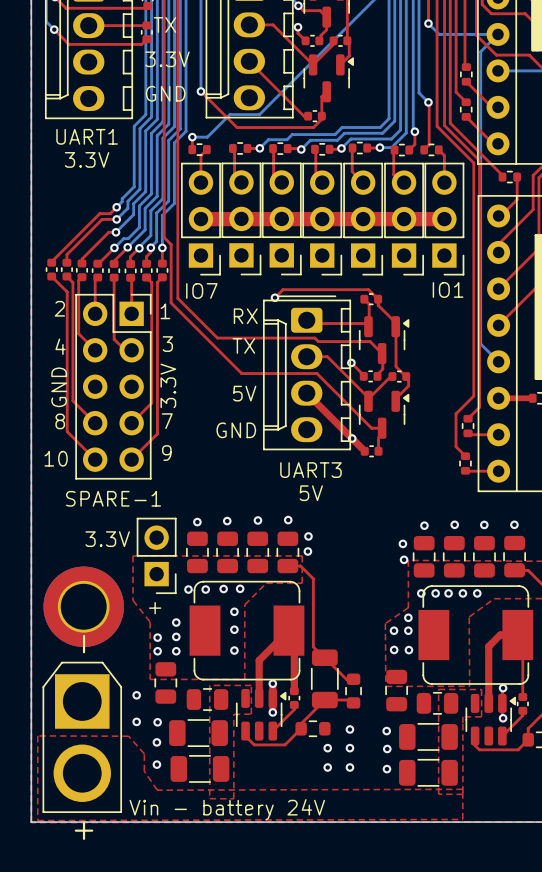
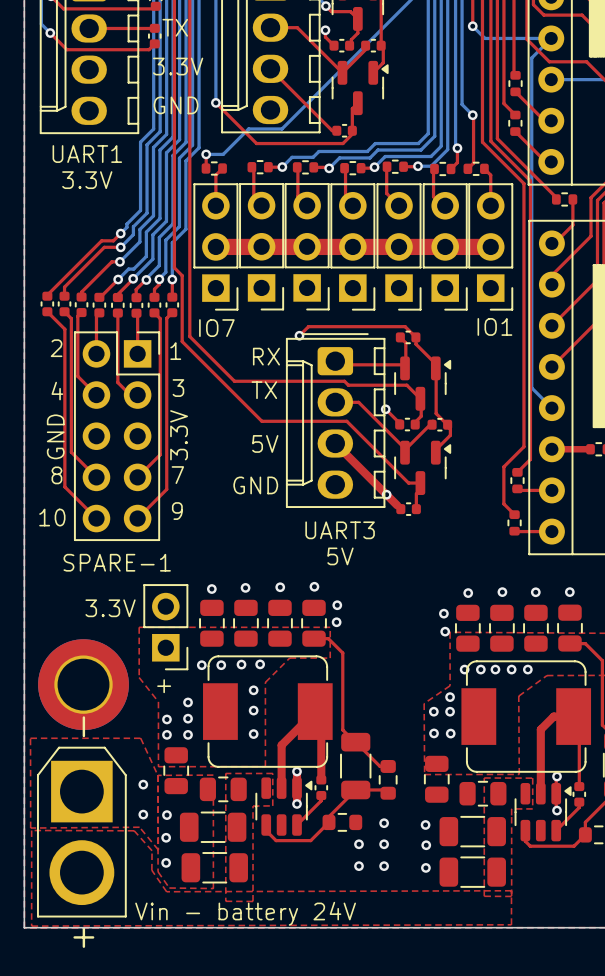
top zone outline: none -> (30, 738) (30, 828) (139, 827) (158, 849) (157, 775) (140, 738) (30, 738)
top zone outline: none -> (213, 775) (158, 775) (158, 871) (169, 888) (213, 888) (213, 775)

